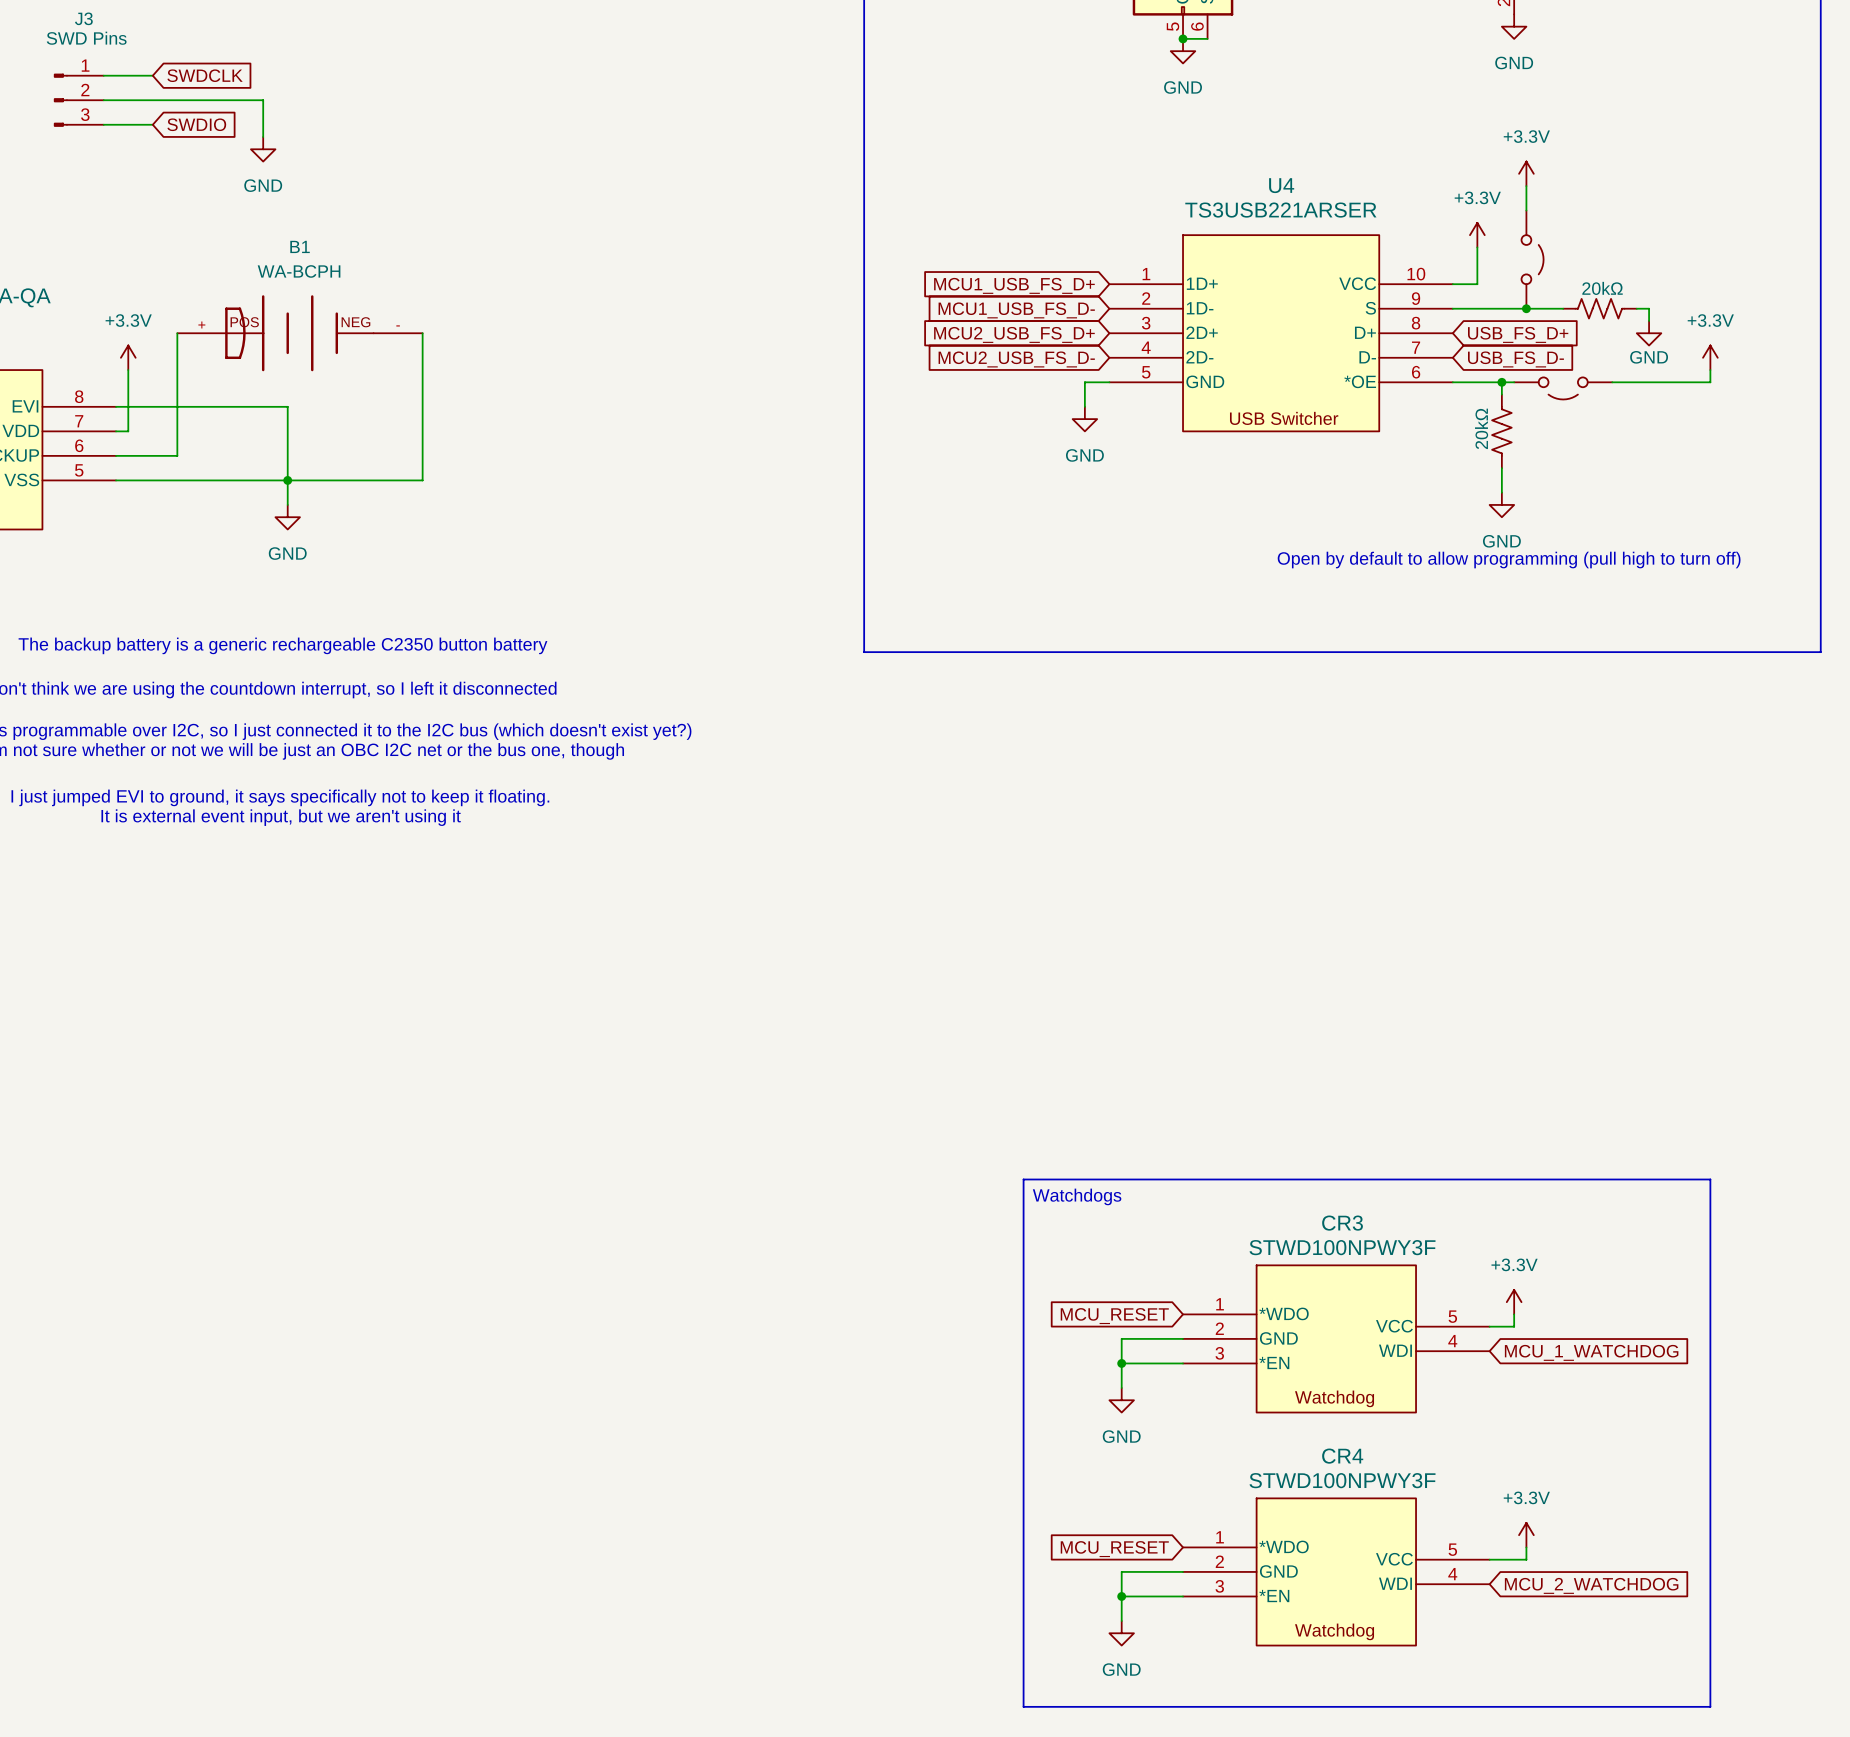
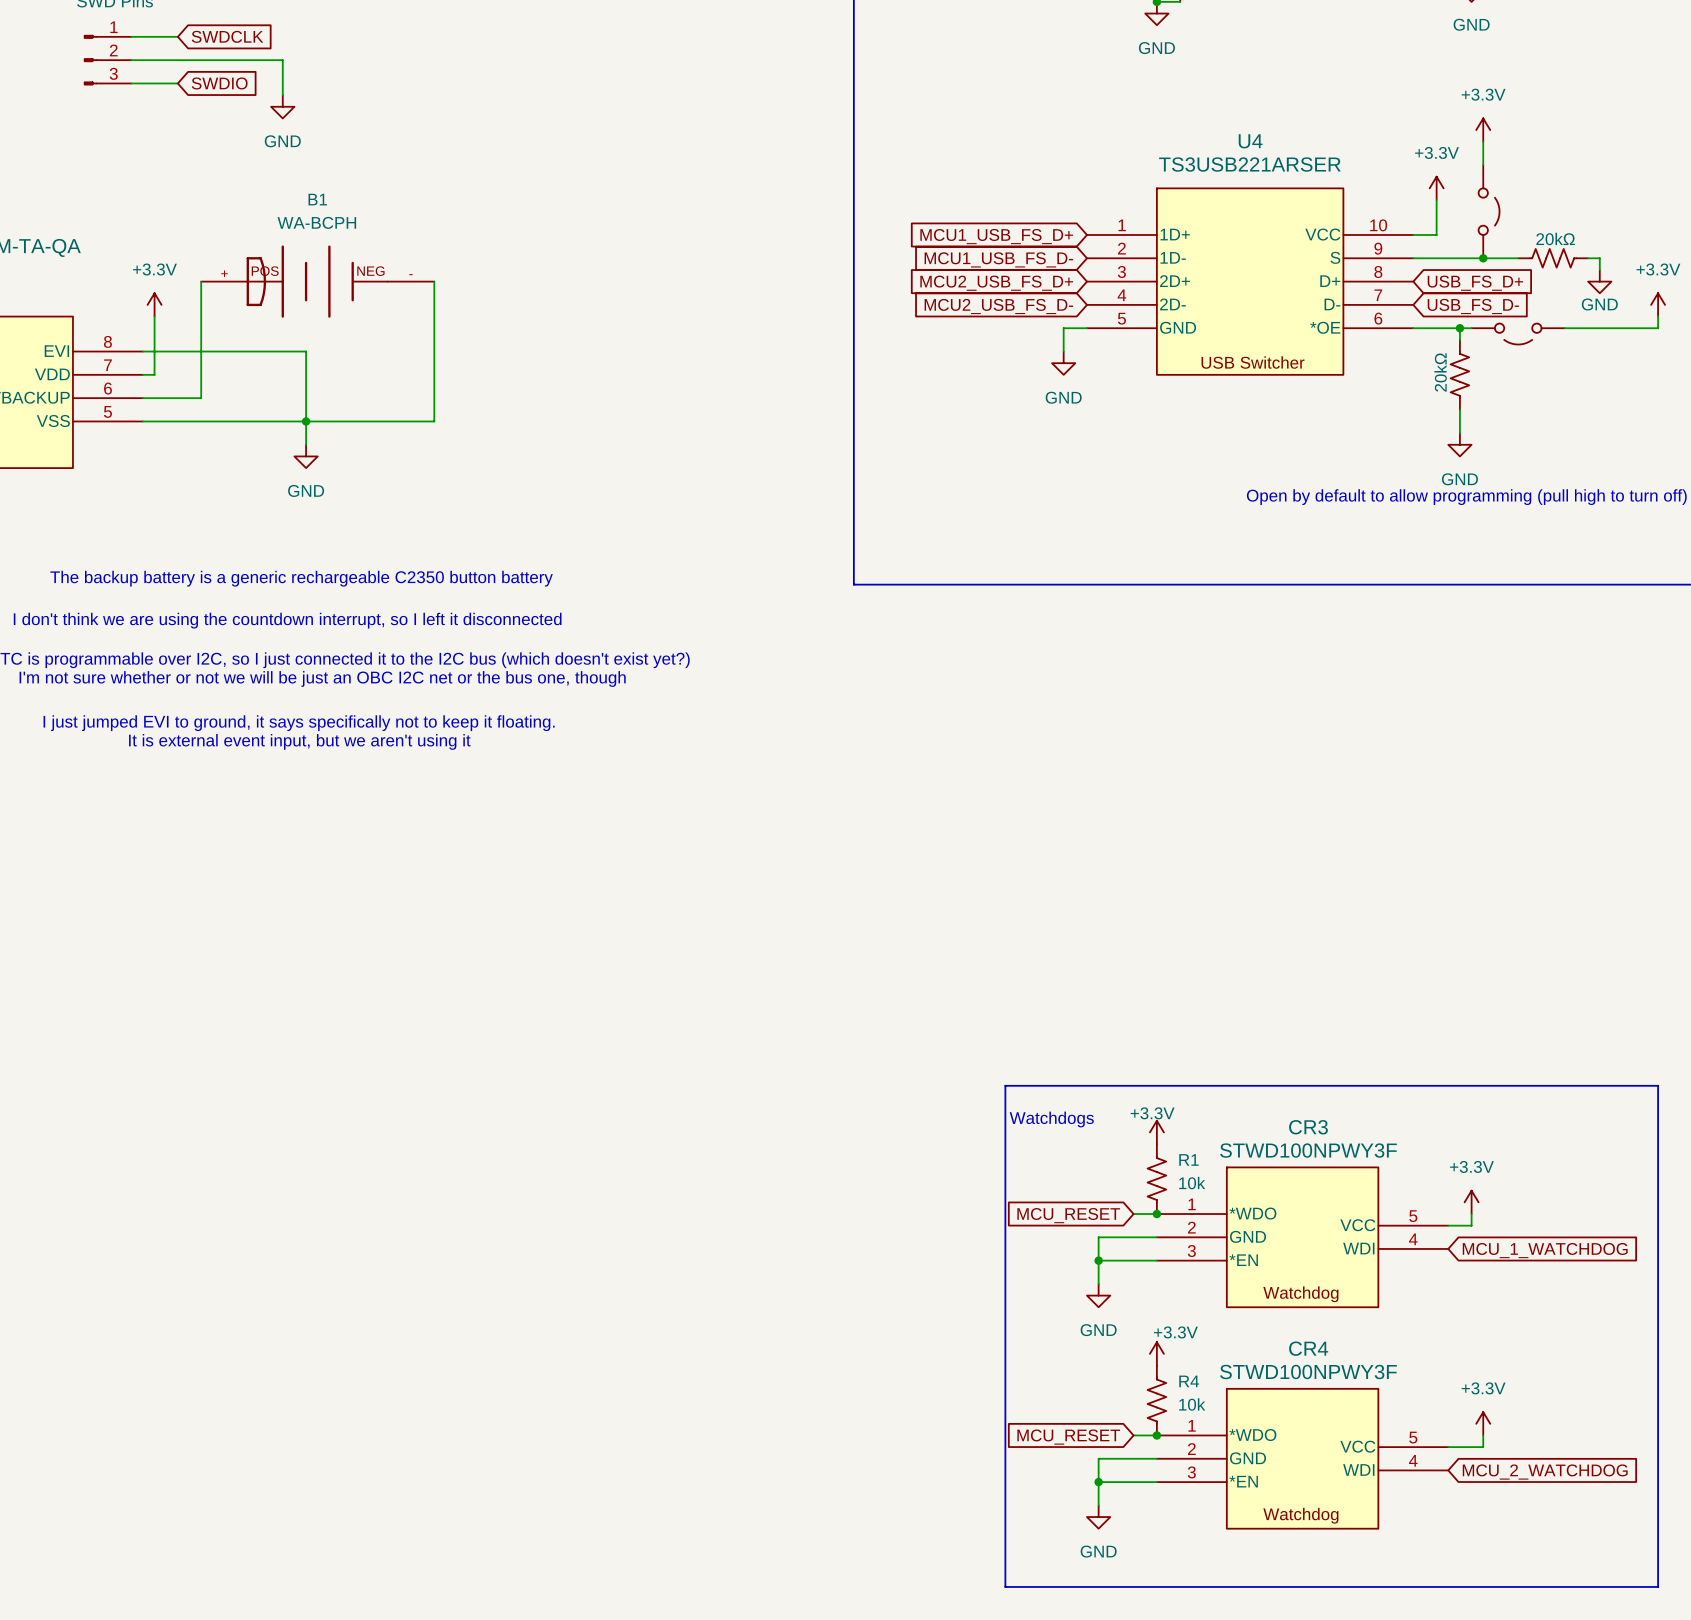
text position: Watchdogs (1077, 1196) -> Watchdogs (1051, 1119)
power symbol: none -> +3.3V (1156, 1132)
R1: none -> 10k (1156, 1179)
wire: none -> (1133, 1214) (1156, 1214)
junction: none -> (1156, 1214)
global label position: MCU_RESET (1114, 1316) -> MCU_RESET (1068, 1215)
power symbol: none -> +3.3V (1156, 1353)
R4: none -> 10k (1156, 1400)
wire: none -> (1133, 1435) (1156, 1435)
junction: none -> (1156, 1435)
global label position: MCU_RESET (1114, 1549) -> MCU_RESET (1068, 1437)

